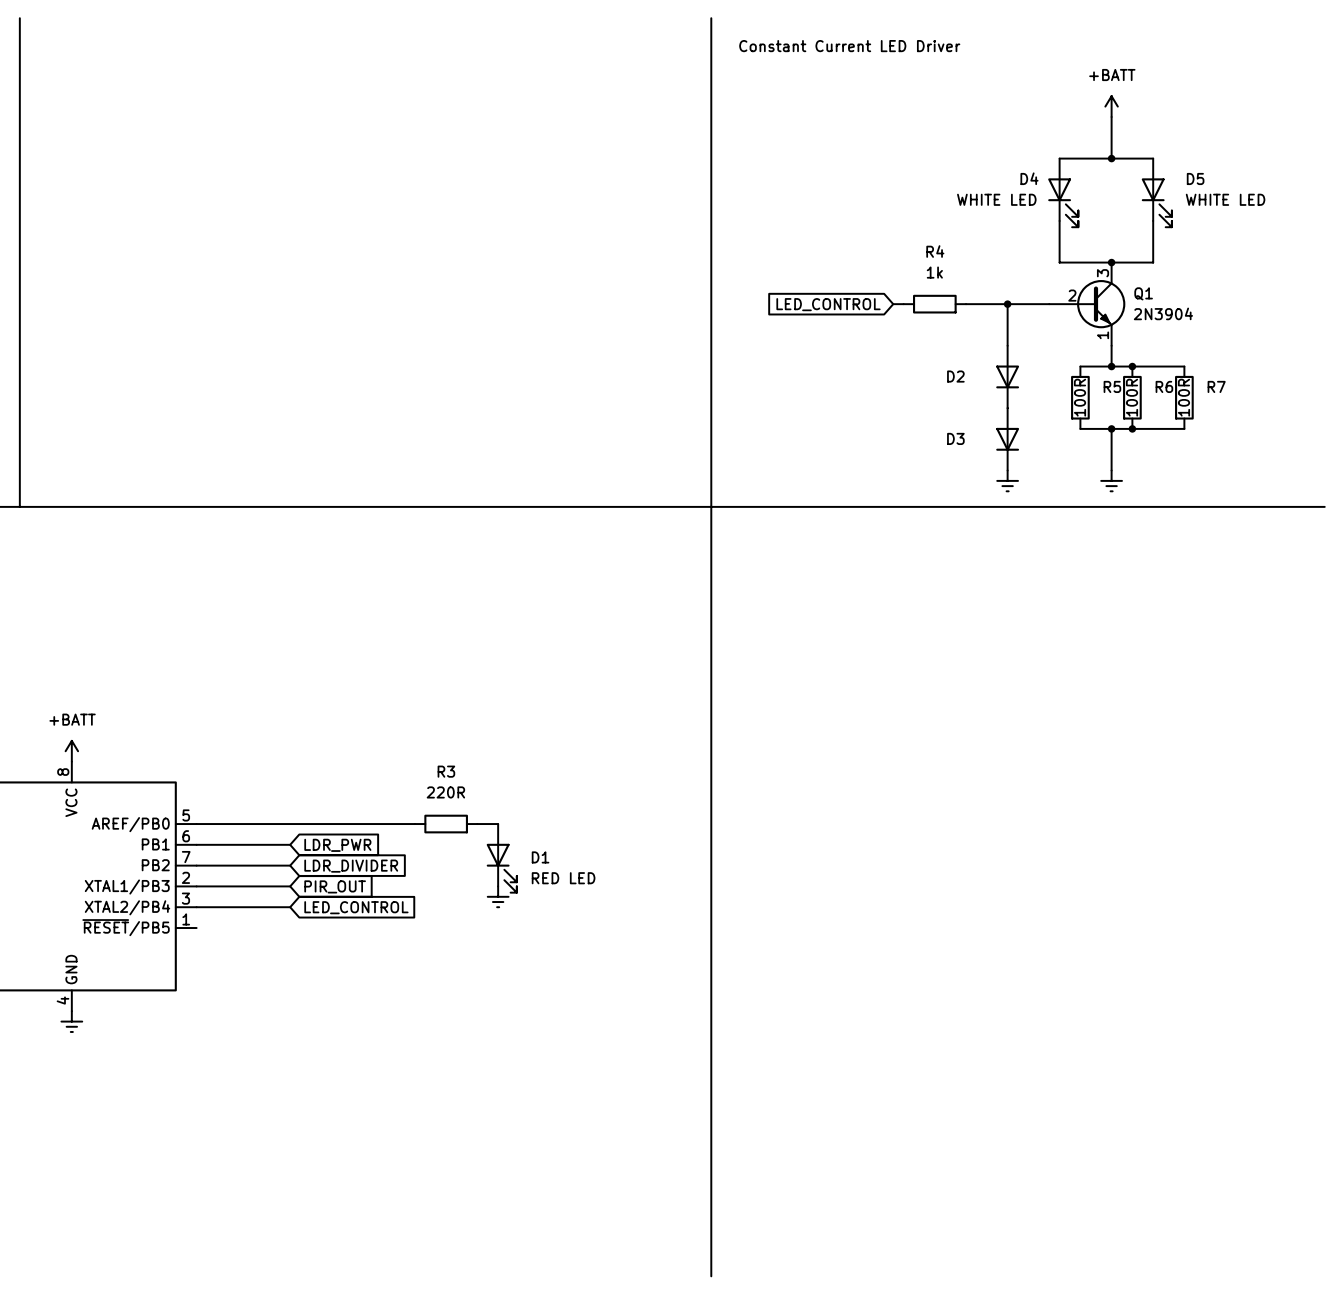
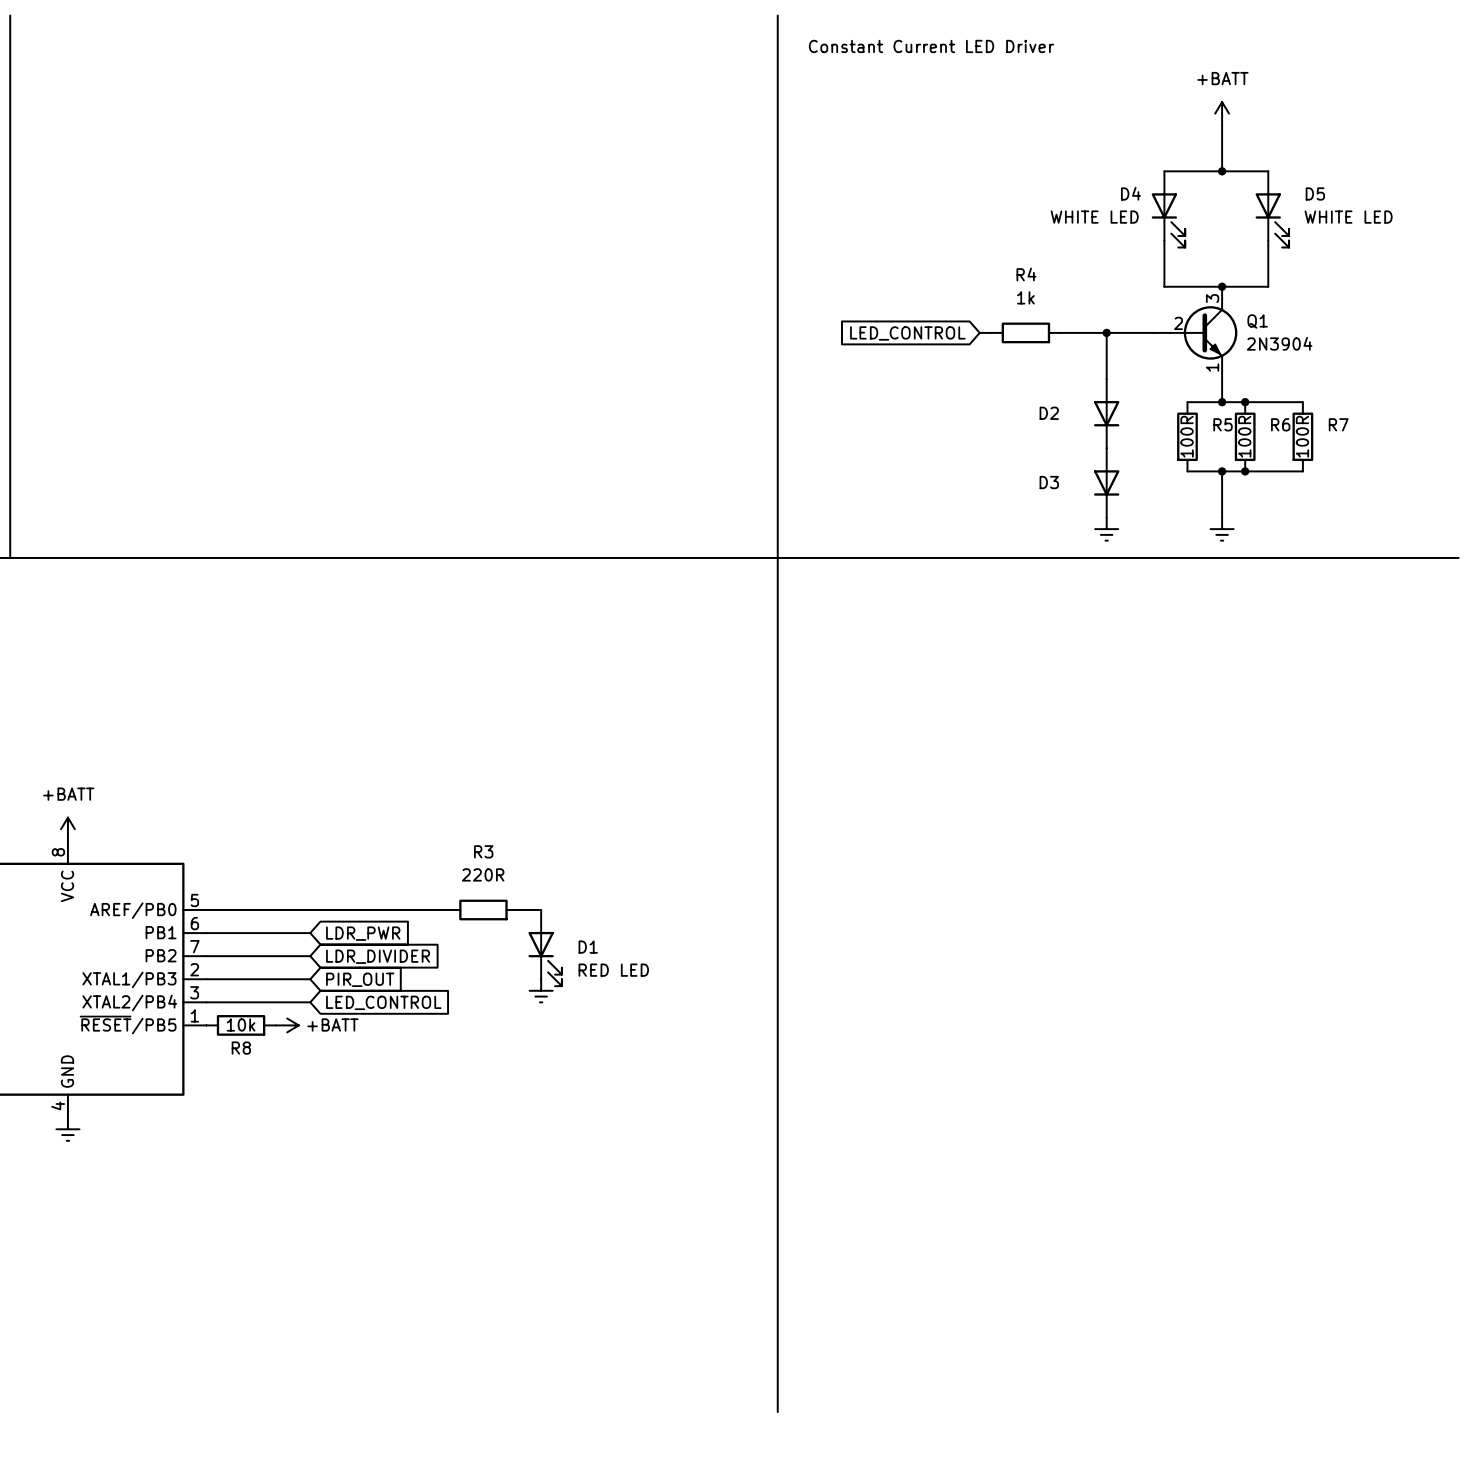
R8: none -> 10k (241, 1025)
power symbol: none -> +BATT (287, 1025)

